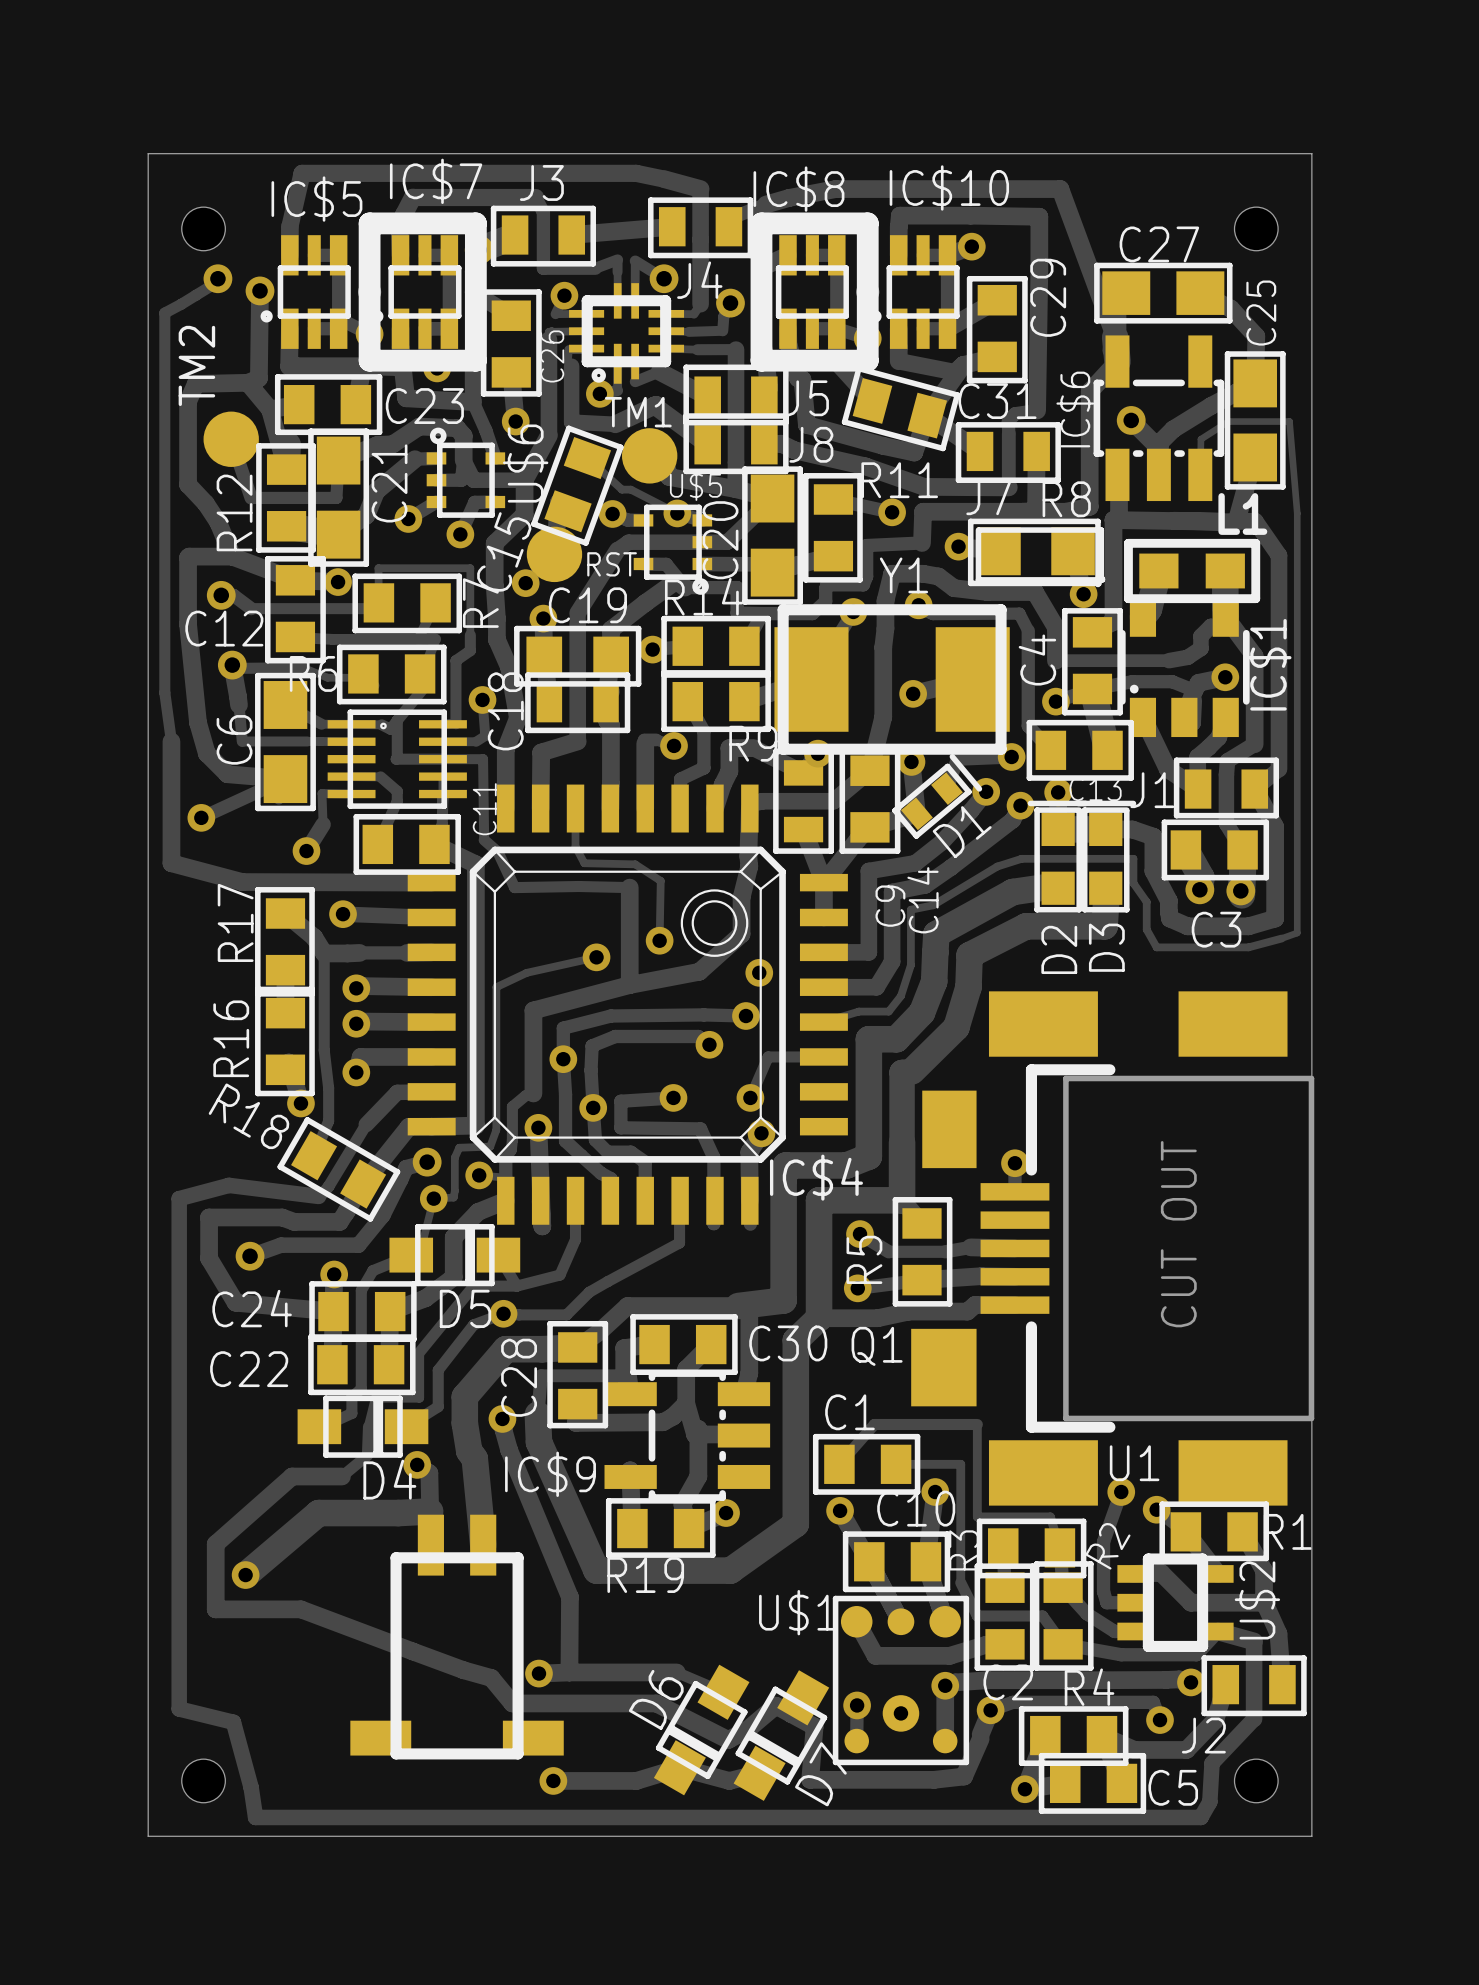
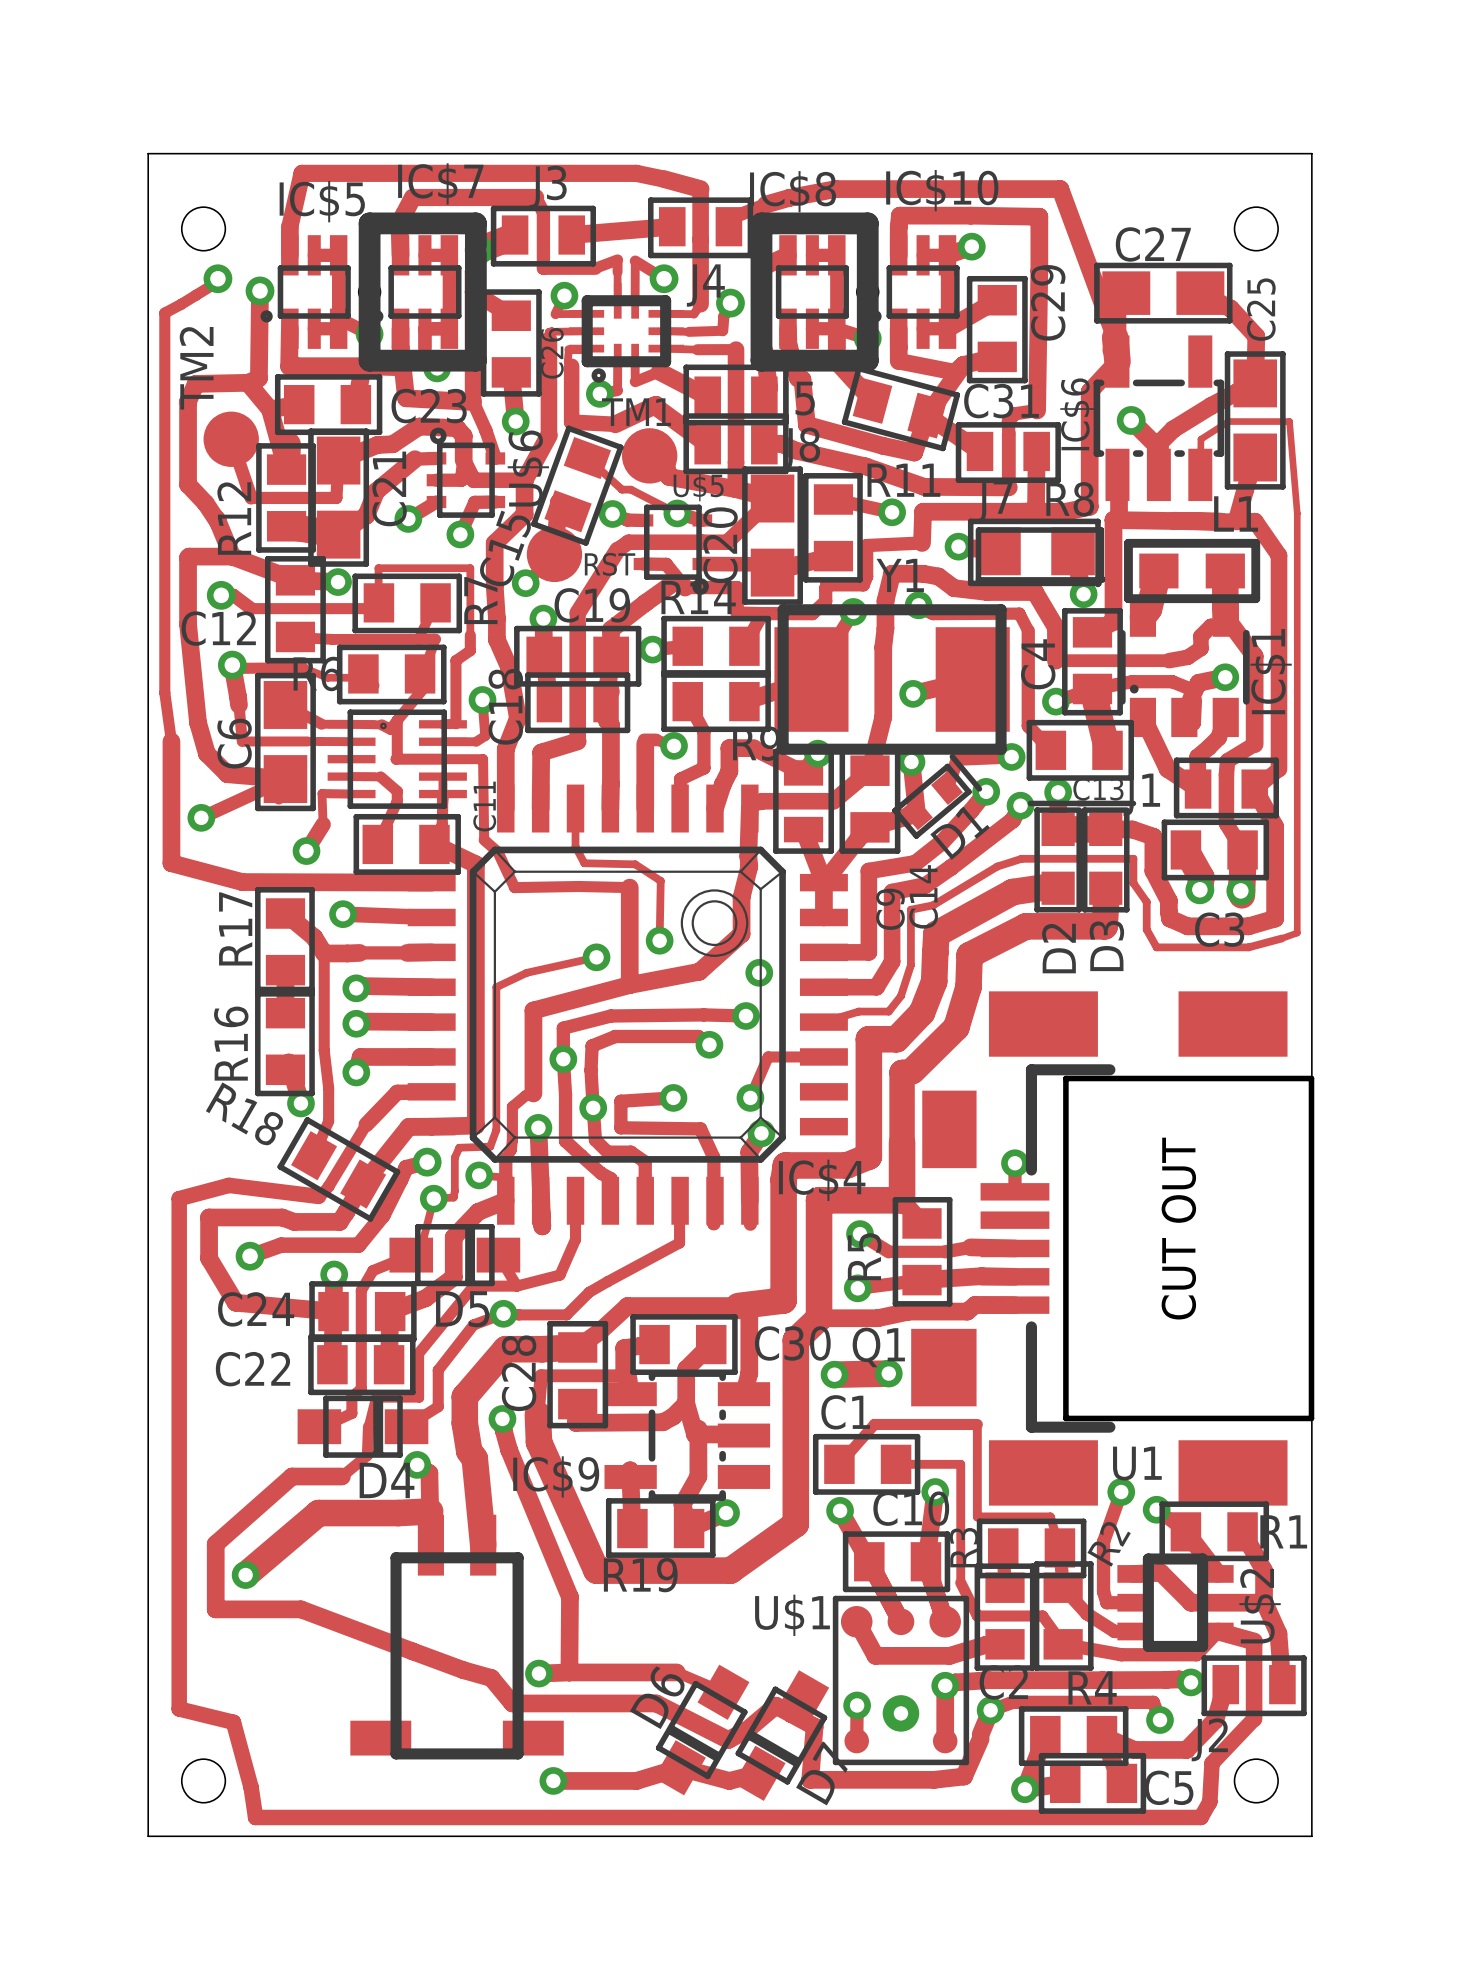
track: none -> (888, 1373) (834, 1374)
via: none -> (888, 1373)
via: none -> (834, 1374)

